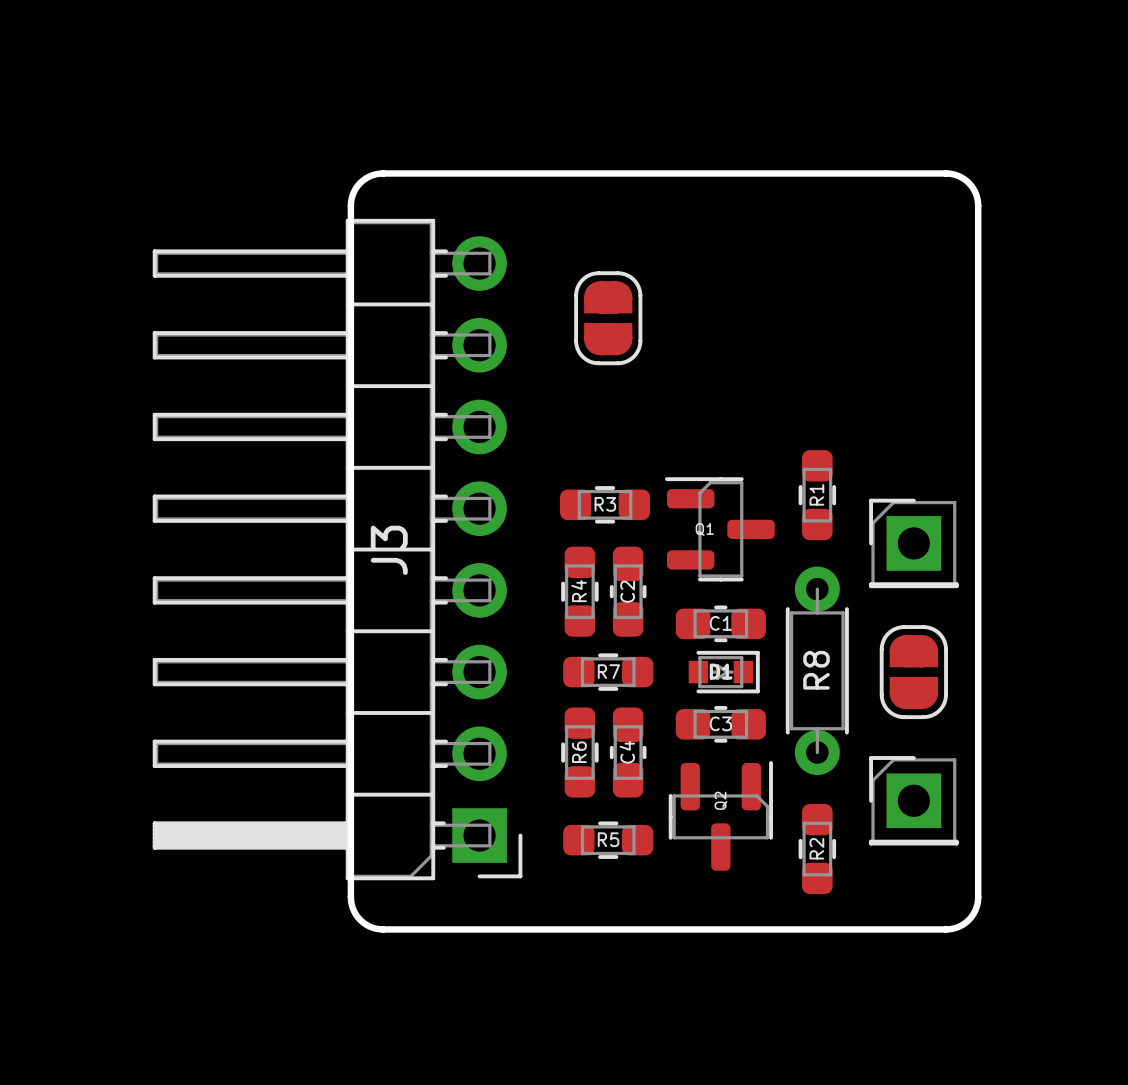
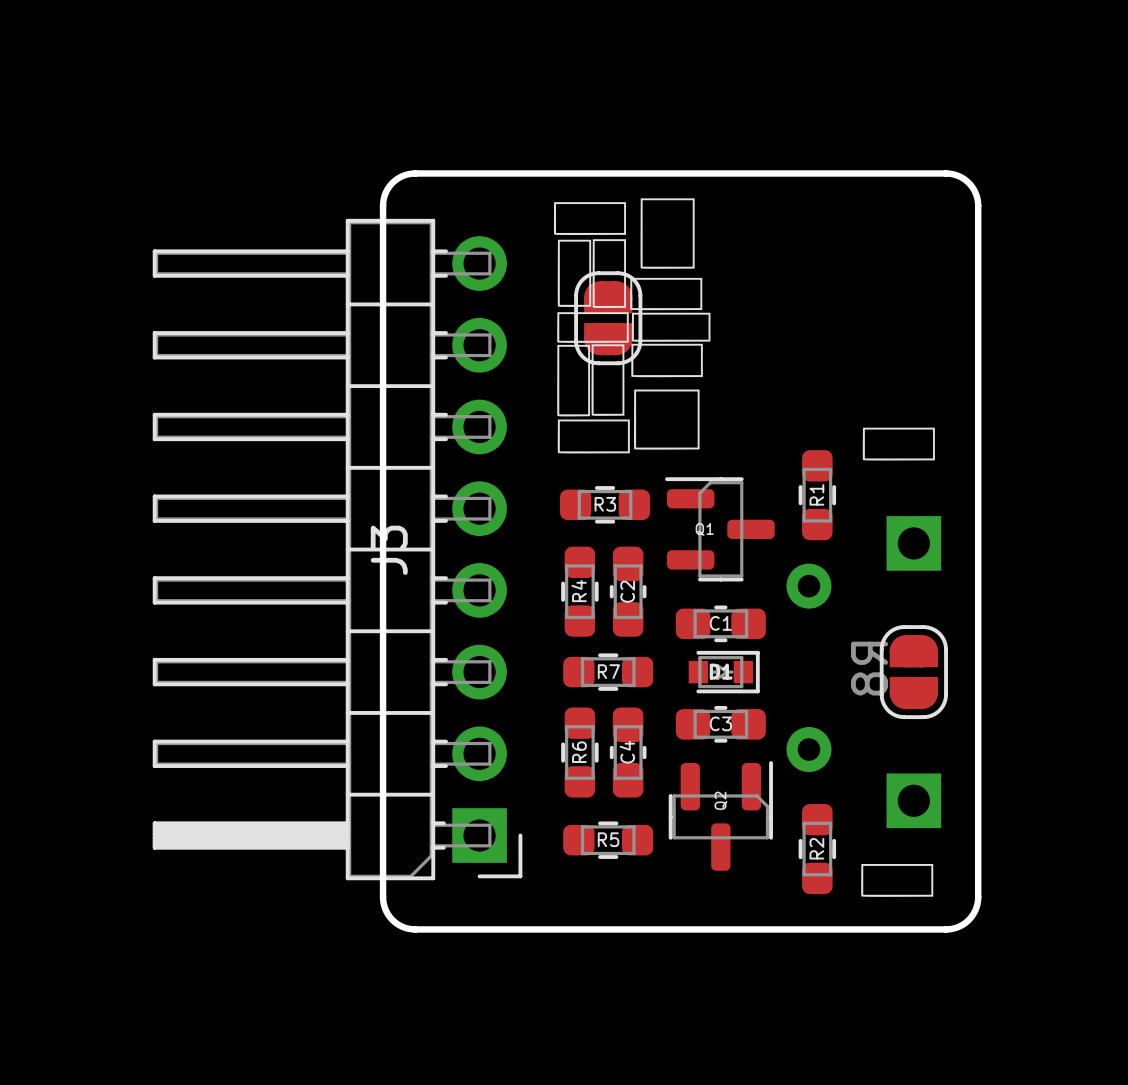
board edge: (415, 173) (379, 173) (369, 176) (355, 188) (350, 205) (351, 900) (355, 914) (369, 926) (379, 929) (415, 929) -> (415, 173) (404, 175) (392, 182) (384, 195) (383, 205) (383, 897) (386, 911) (392, 920) (401, 926) (415, 929)
drawing: none -> [553, 198, 935, 897]
part side: top (913, 543) -> bottom (913, 543)
R8 side: top (817, 670) -> bottom (808, 667)
part side: top (913, 800) -> bottom (913, 800)

